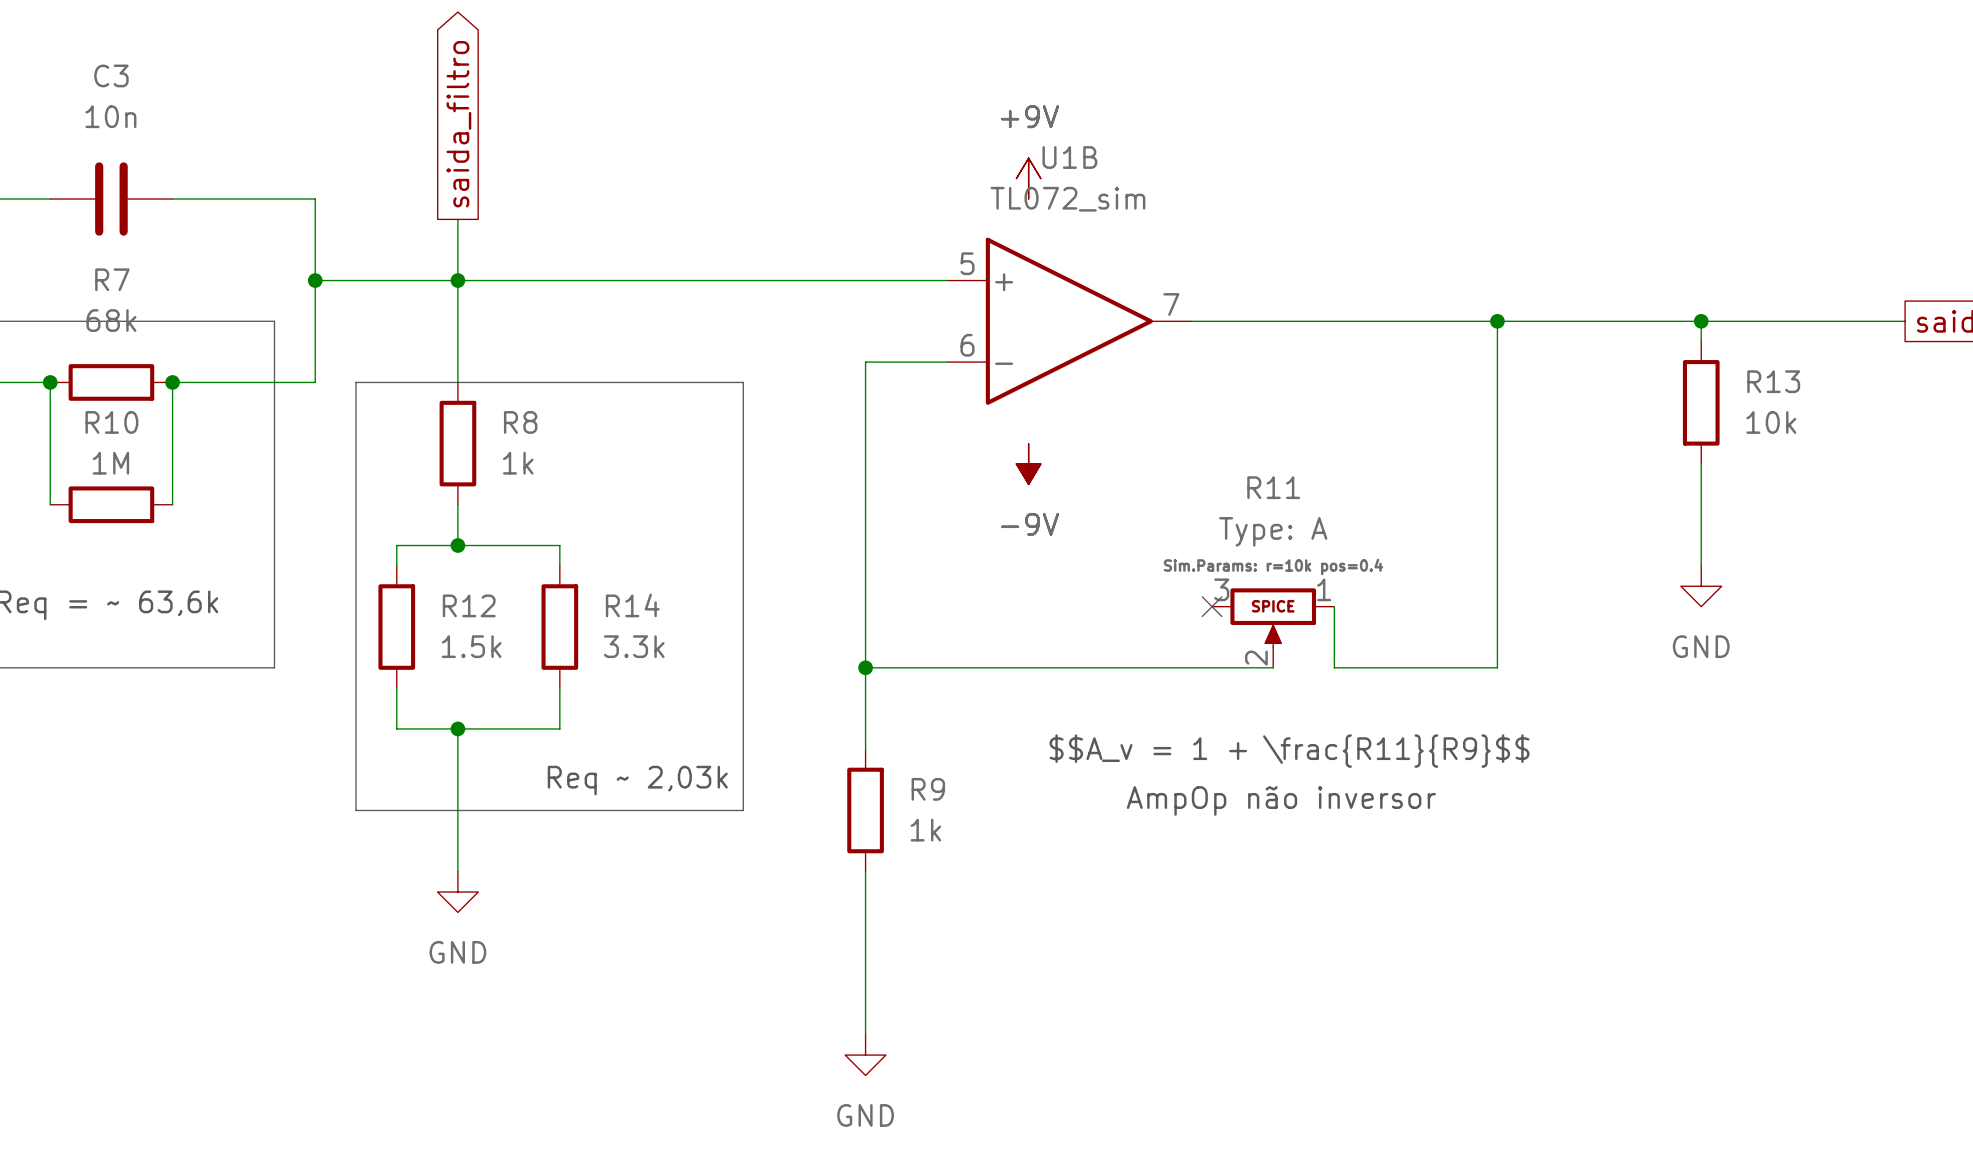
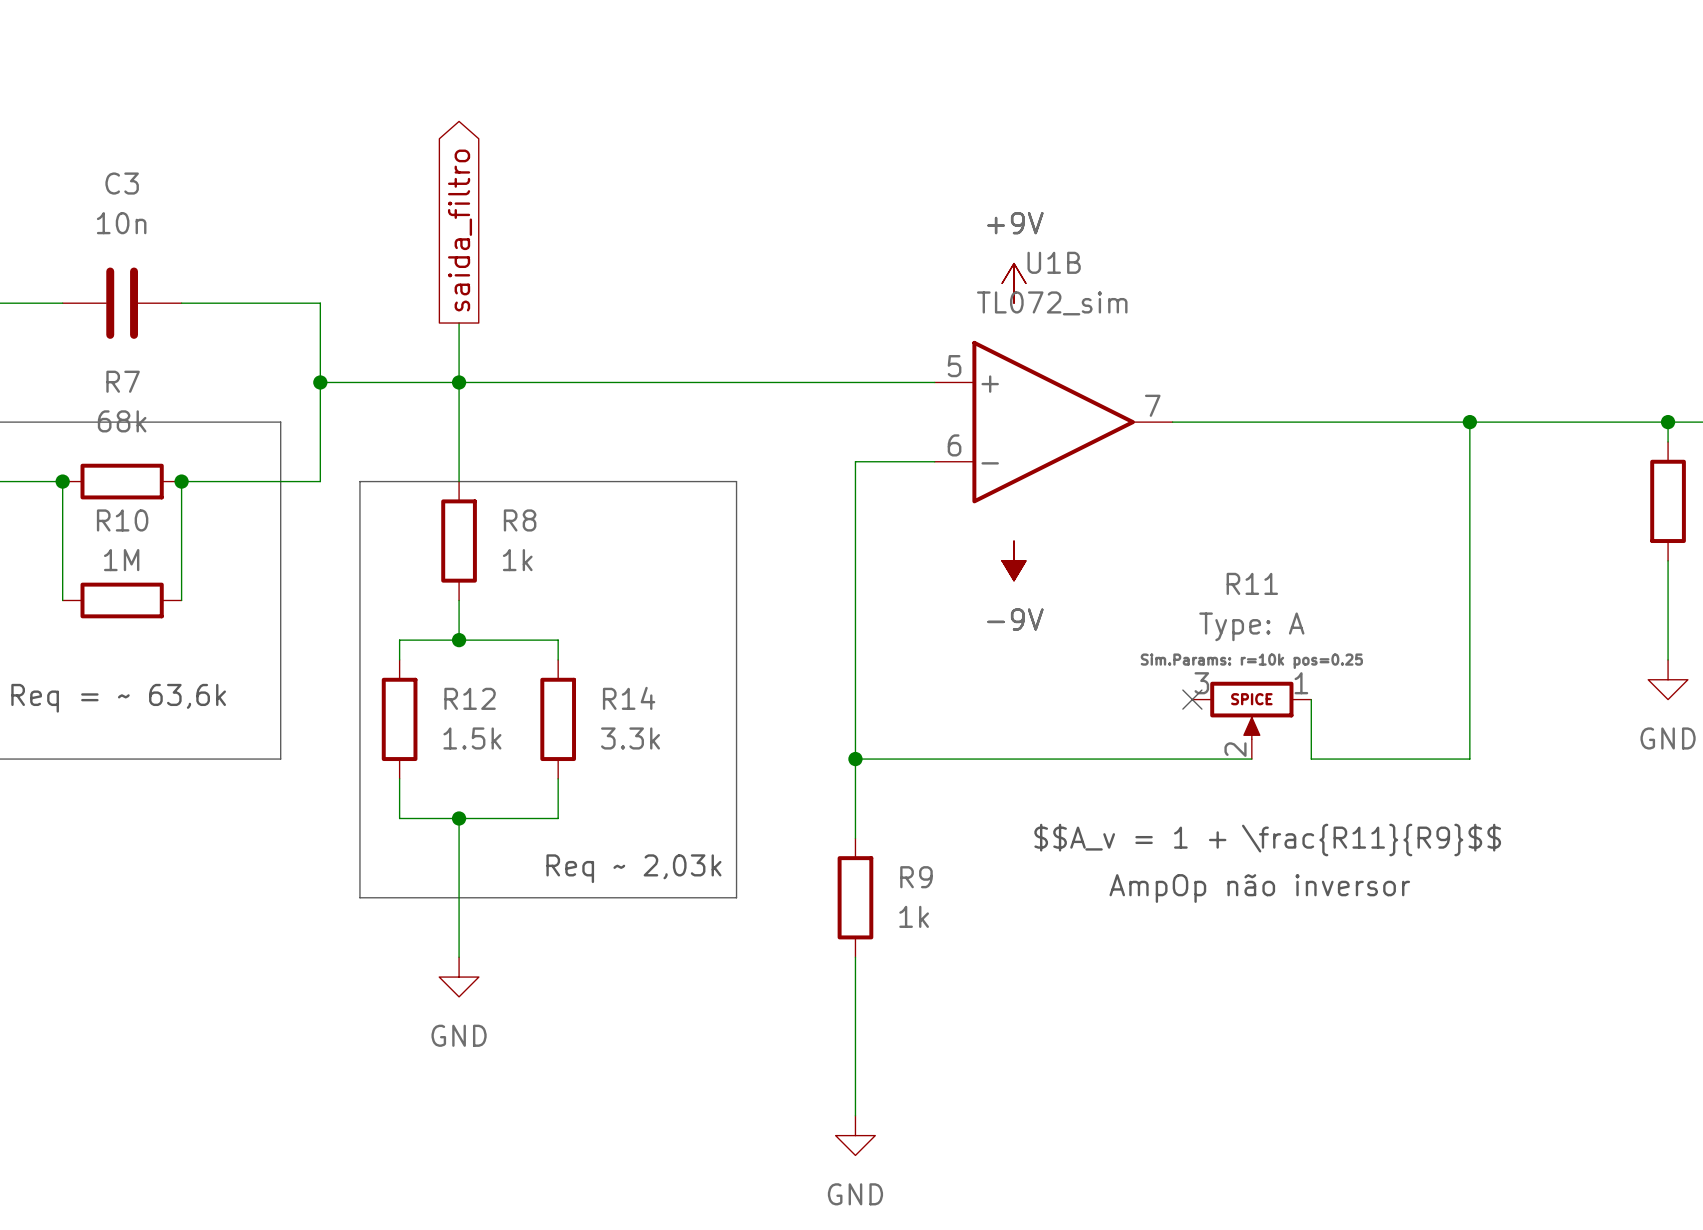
R11 text: Sim.Params: r=10k pos=0.4 (1273, 566) -> Sim.Params: r=10k pos=0.25 (1251, 661)

